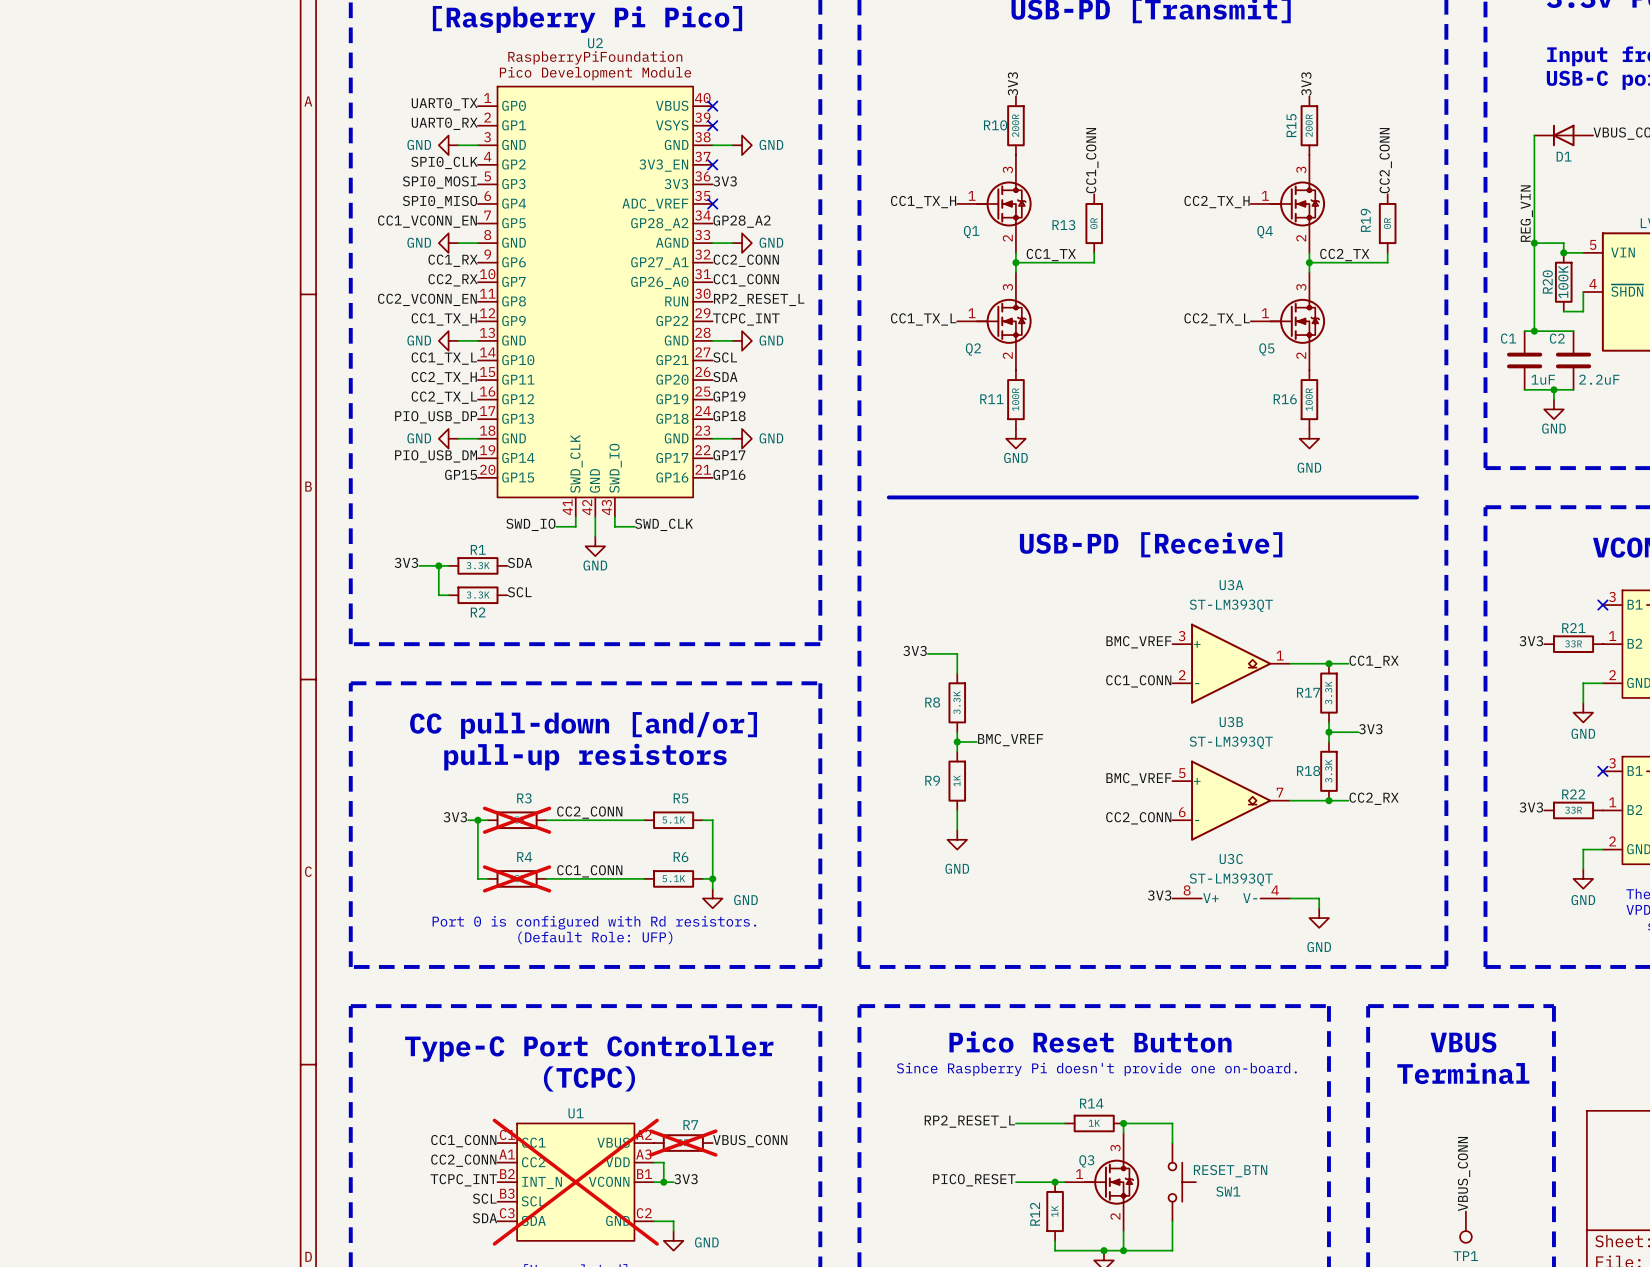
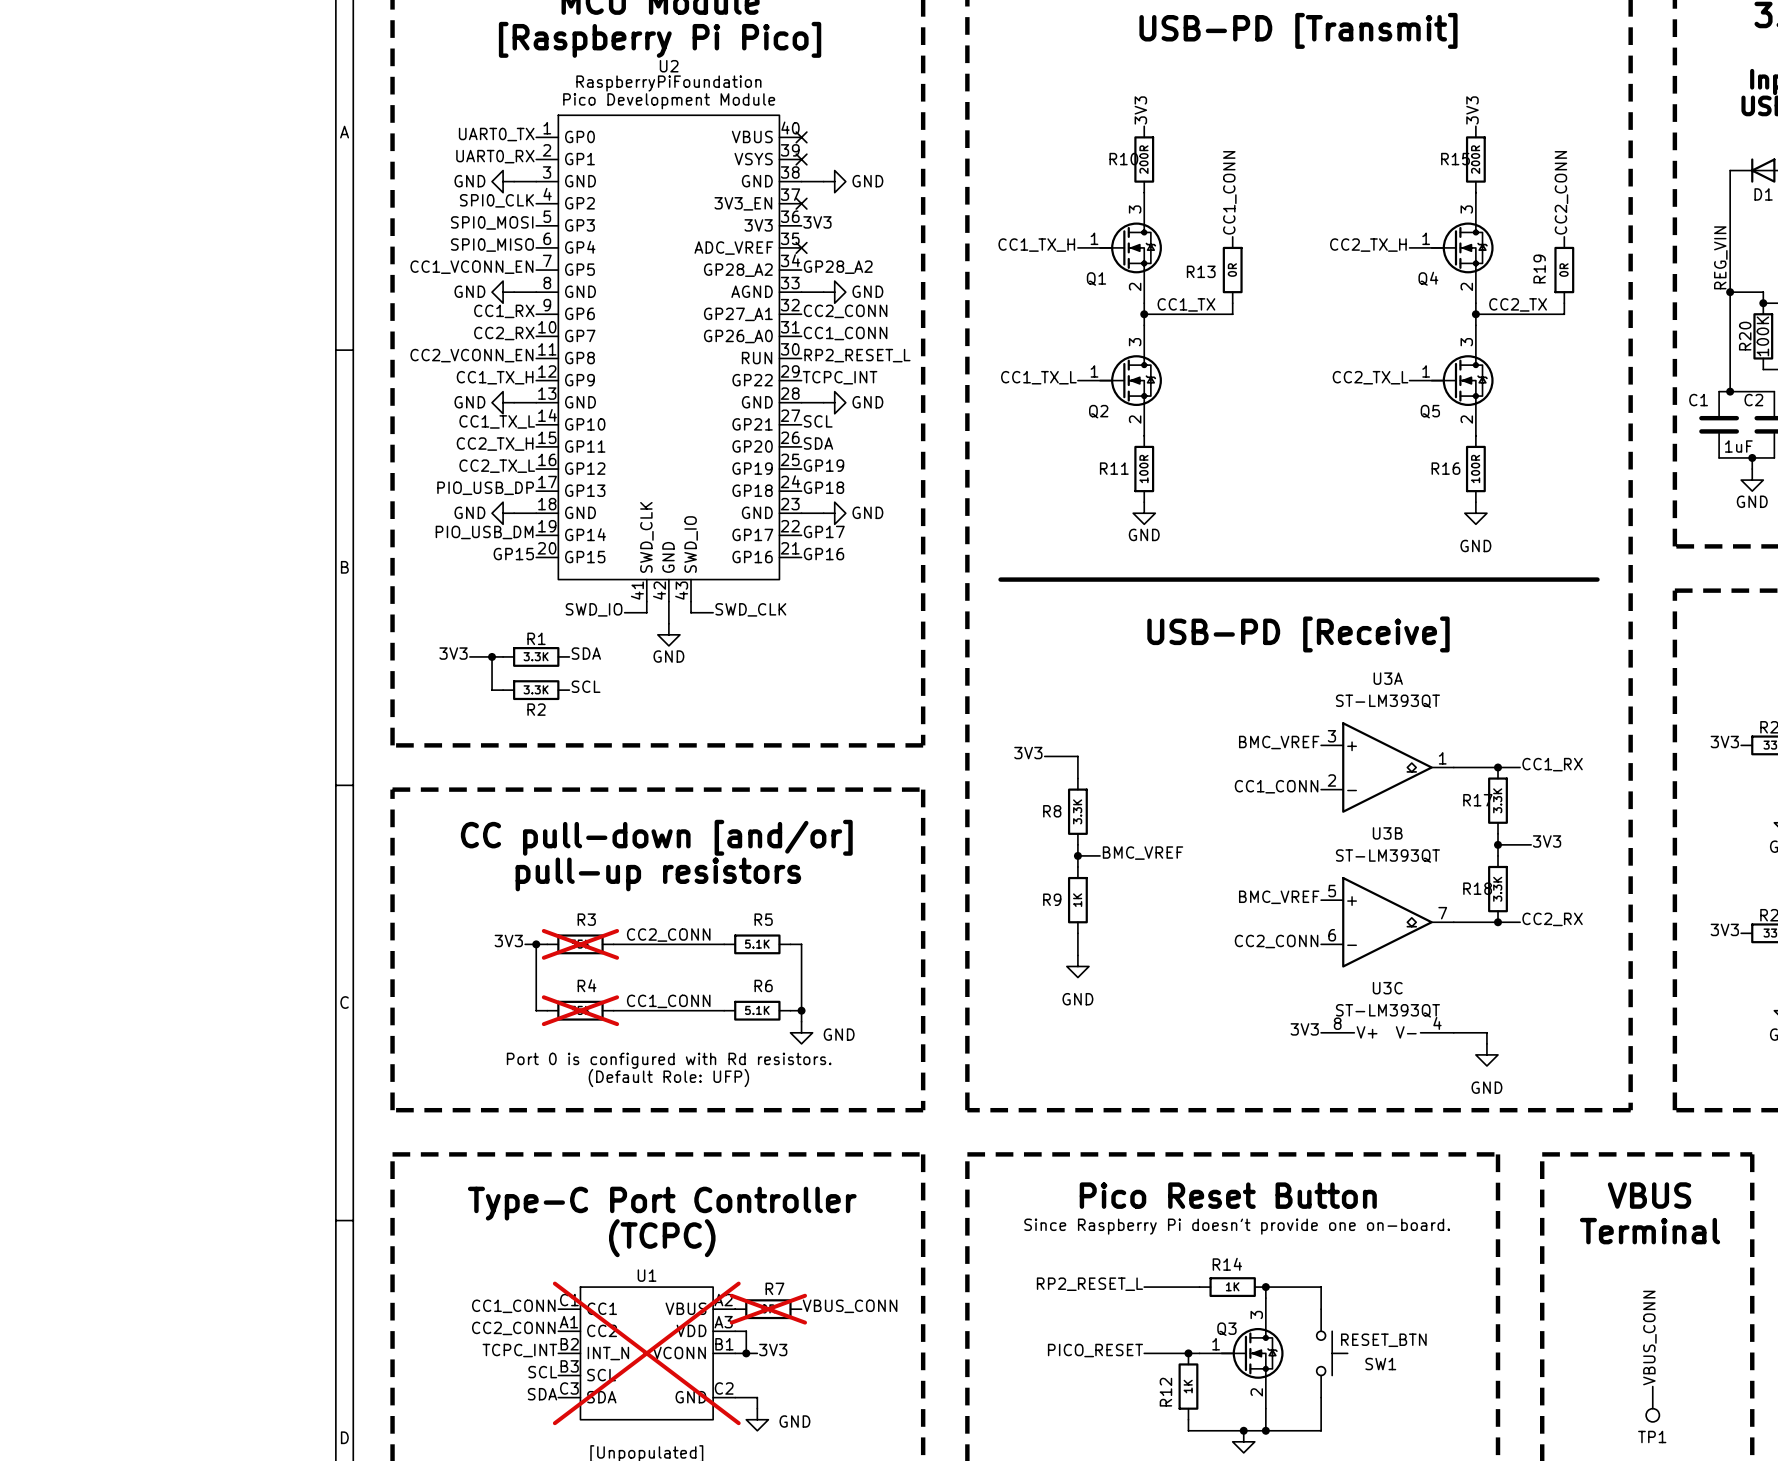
R15 name rotation: 0° (1291, 125) -> 90° clockwise (1455, 159)

